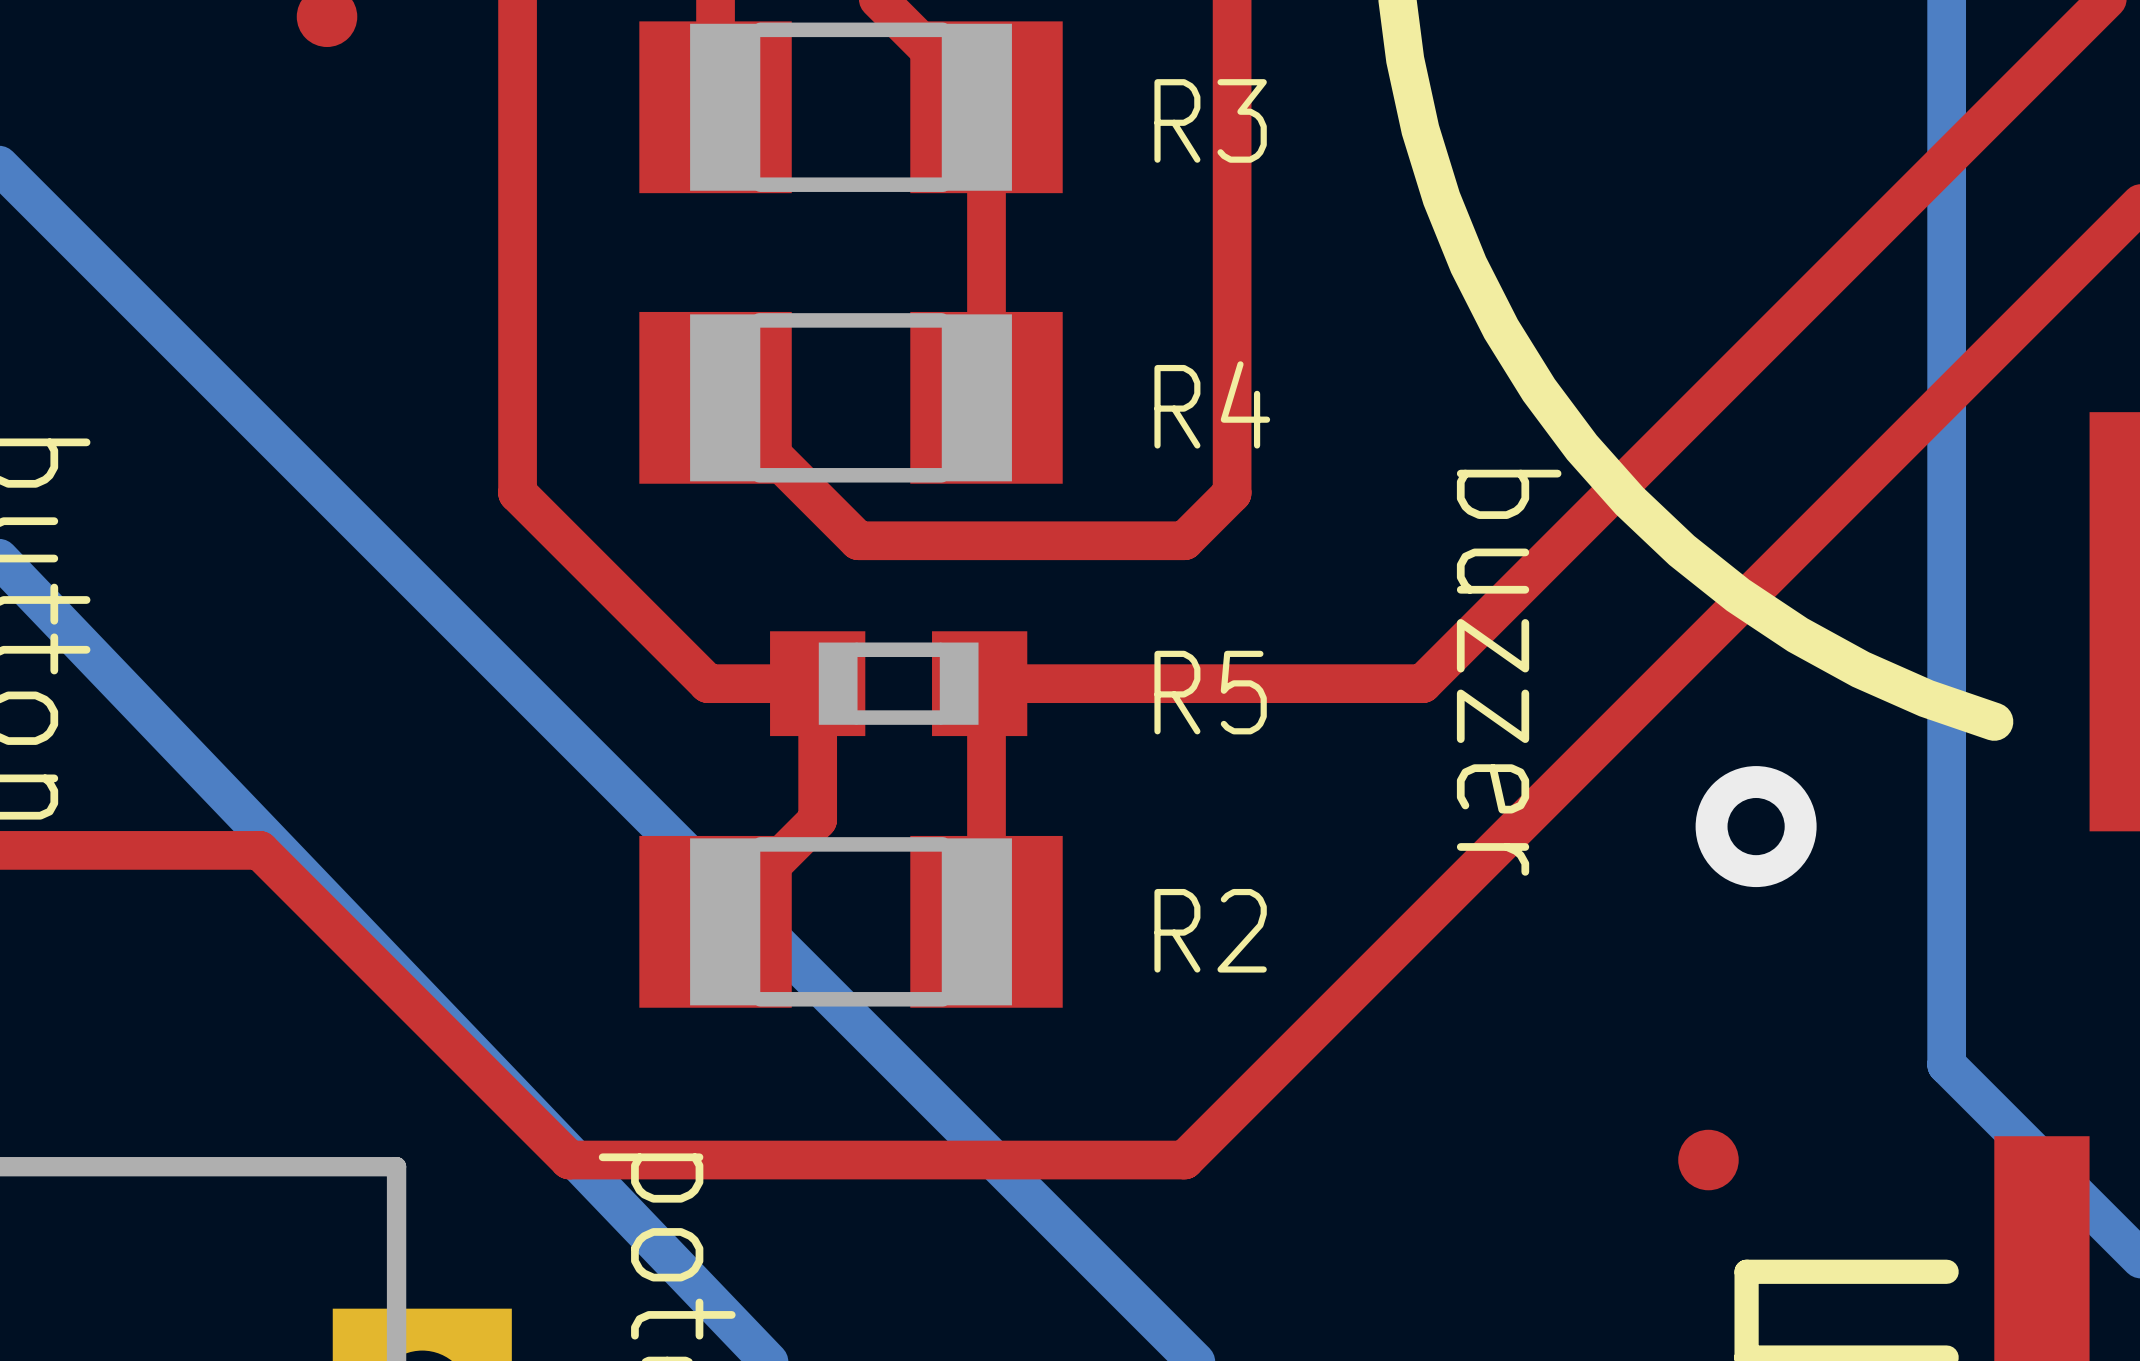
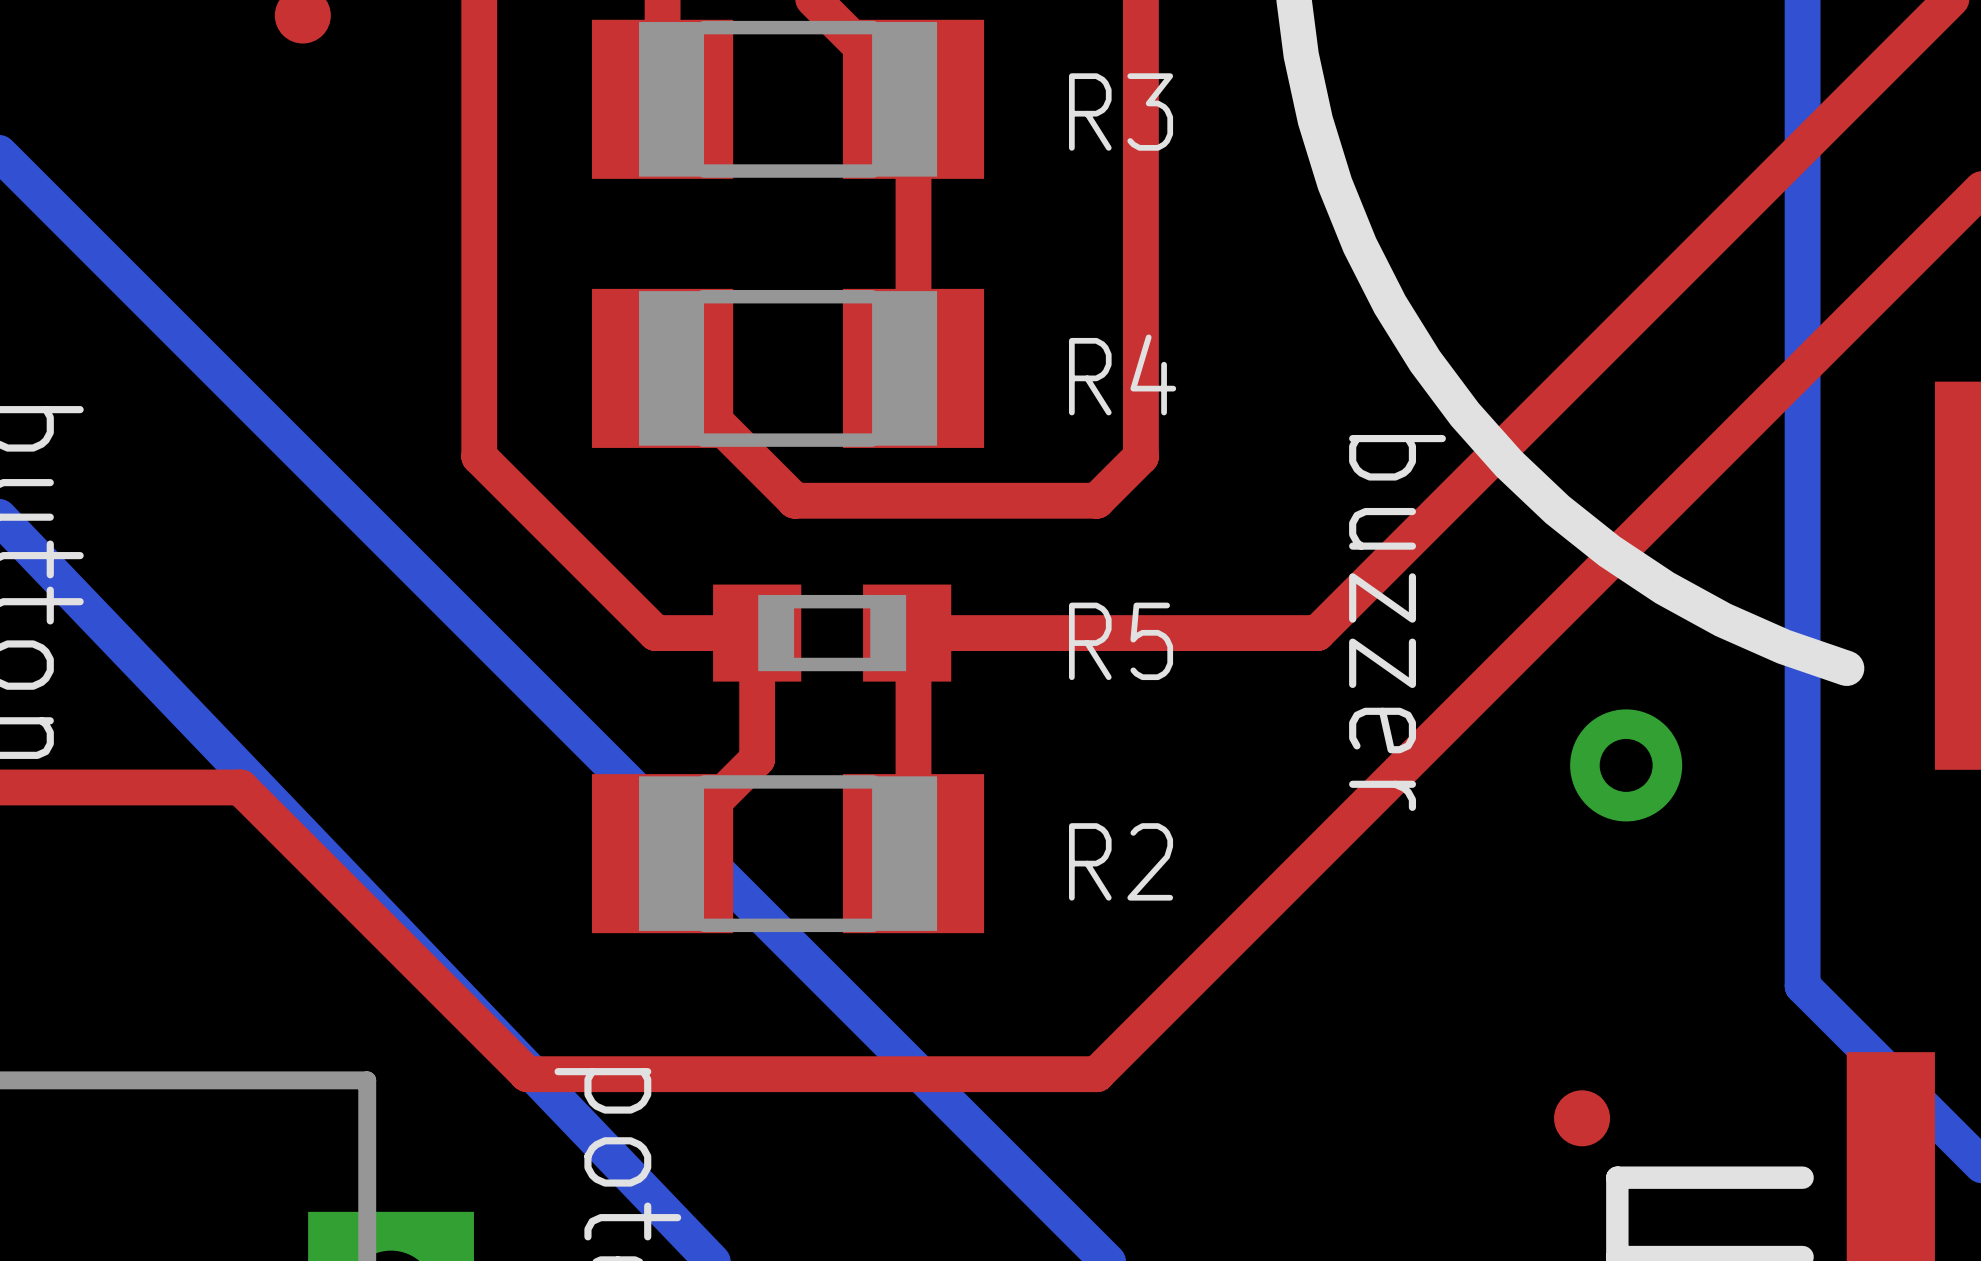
part position: (1708, 1160) -> (1582, 1118)

